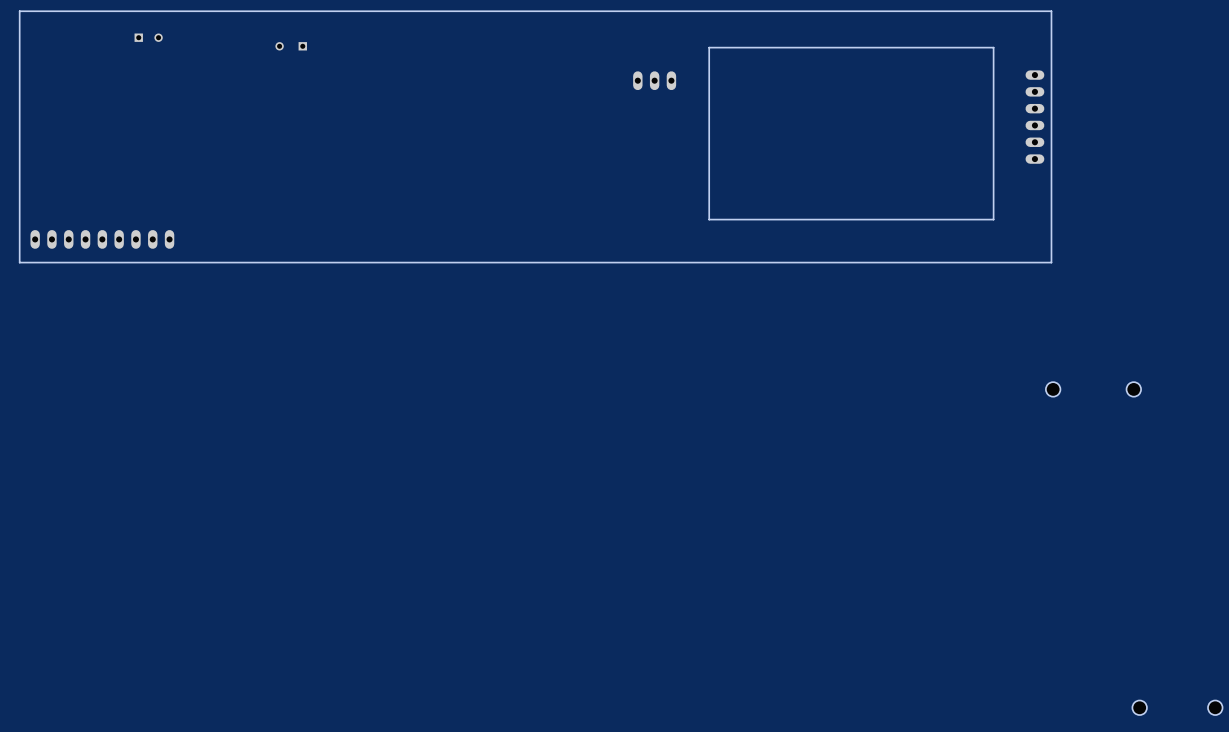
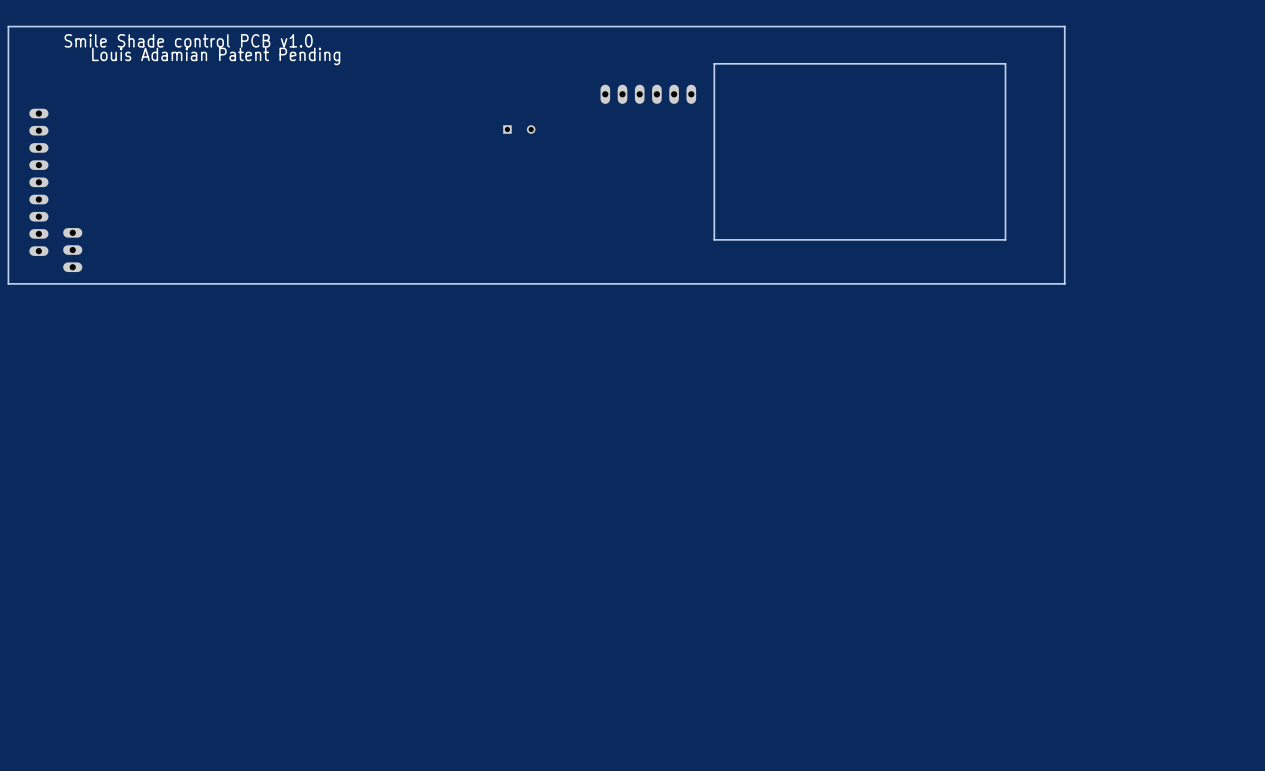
text: none -> Smile Shade control PCB v1.0 (188, 40)
part: (148, 37) -> none
text: none -> Louis Adamian Patent Pending (216, 56)
part: (291, 46) -> none
part: none -> (648, 94)
part: (654, 80) -> none
part: none -> (519, 129)
part: (1034, 117) -> none
part: none -> (72, 250)
part rotation: 0° (102, 239) -> 90° clockwise (38, 182)
part position: (102, 239) -> (38, 182)
hole: (1053, 389) -> none
hole: (1133, 389) -> none
hole: (1139, 707) -> none
hole: (1215, 707) -> none

